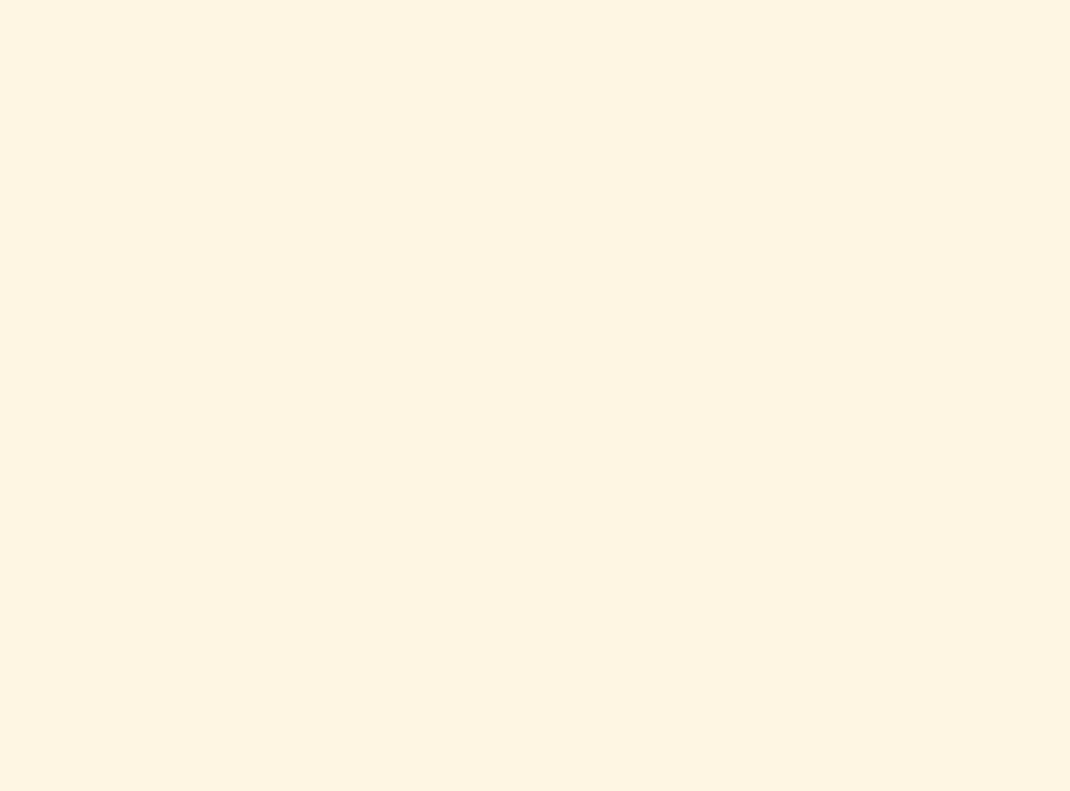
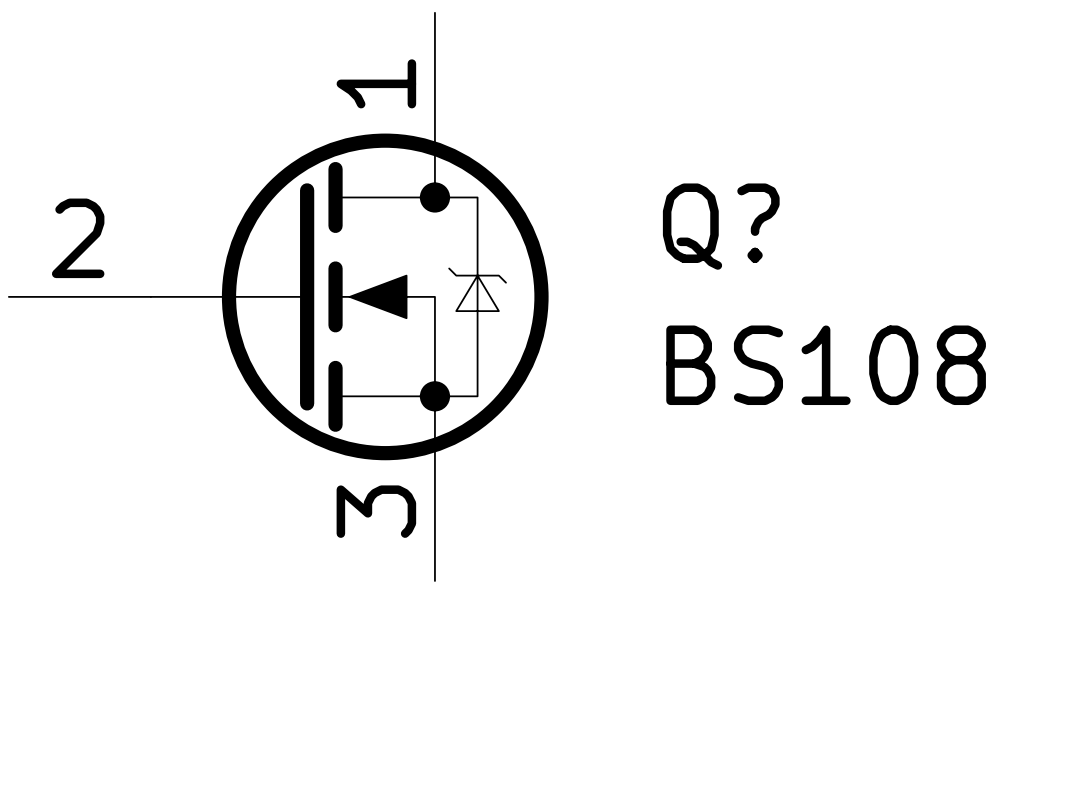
Q?: none -> BS108 (278, 296)

